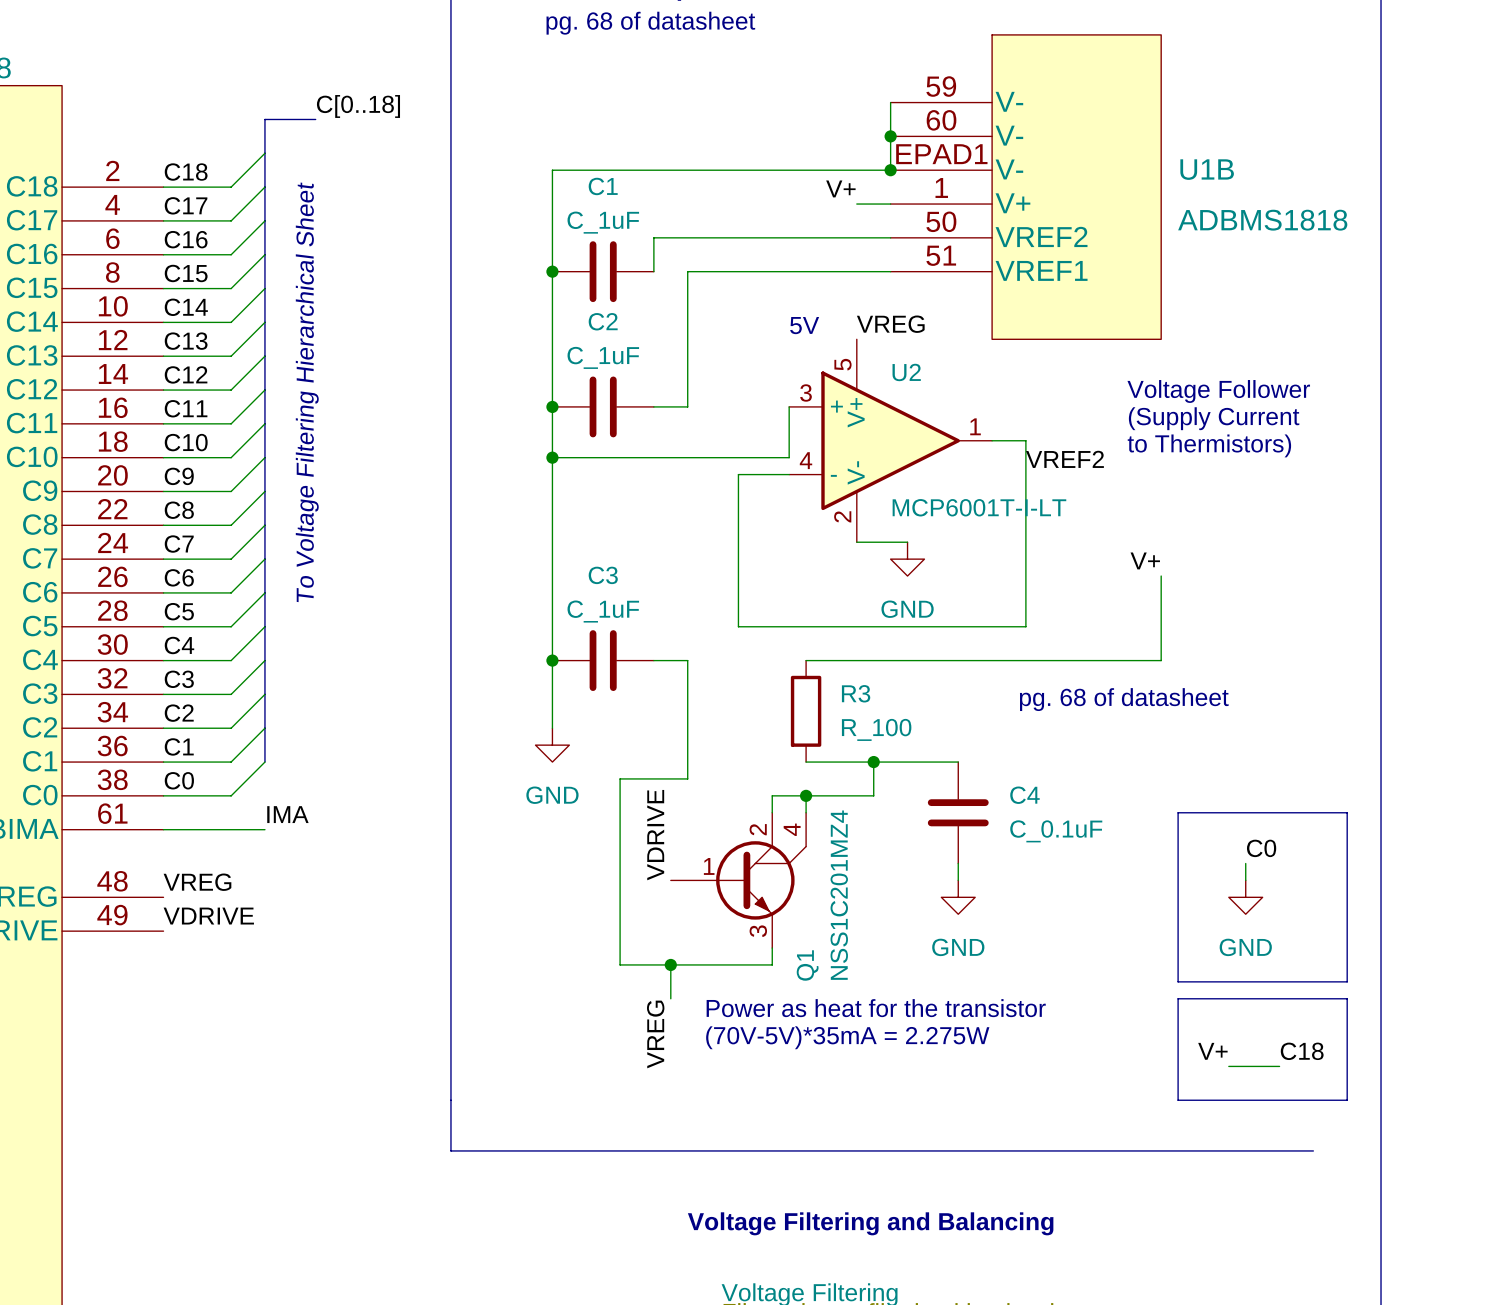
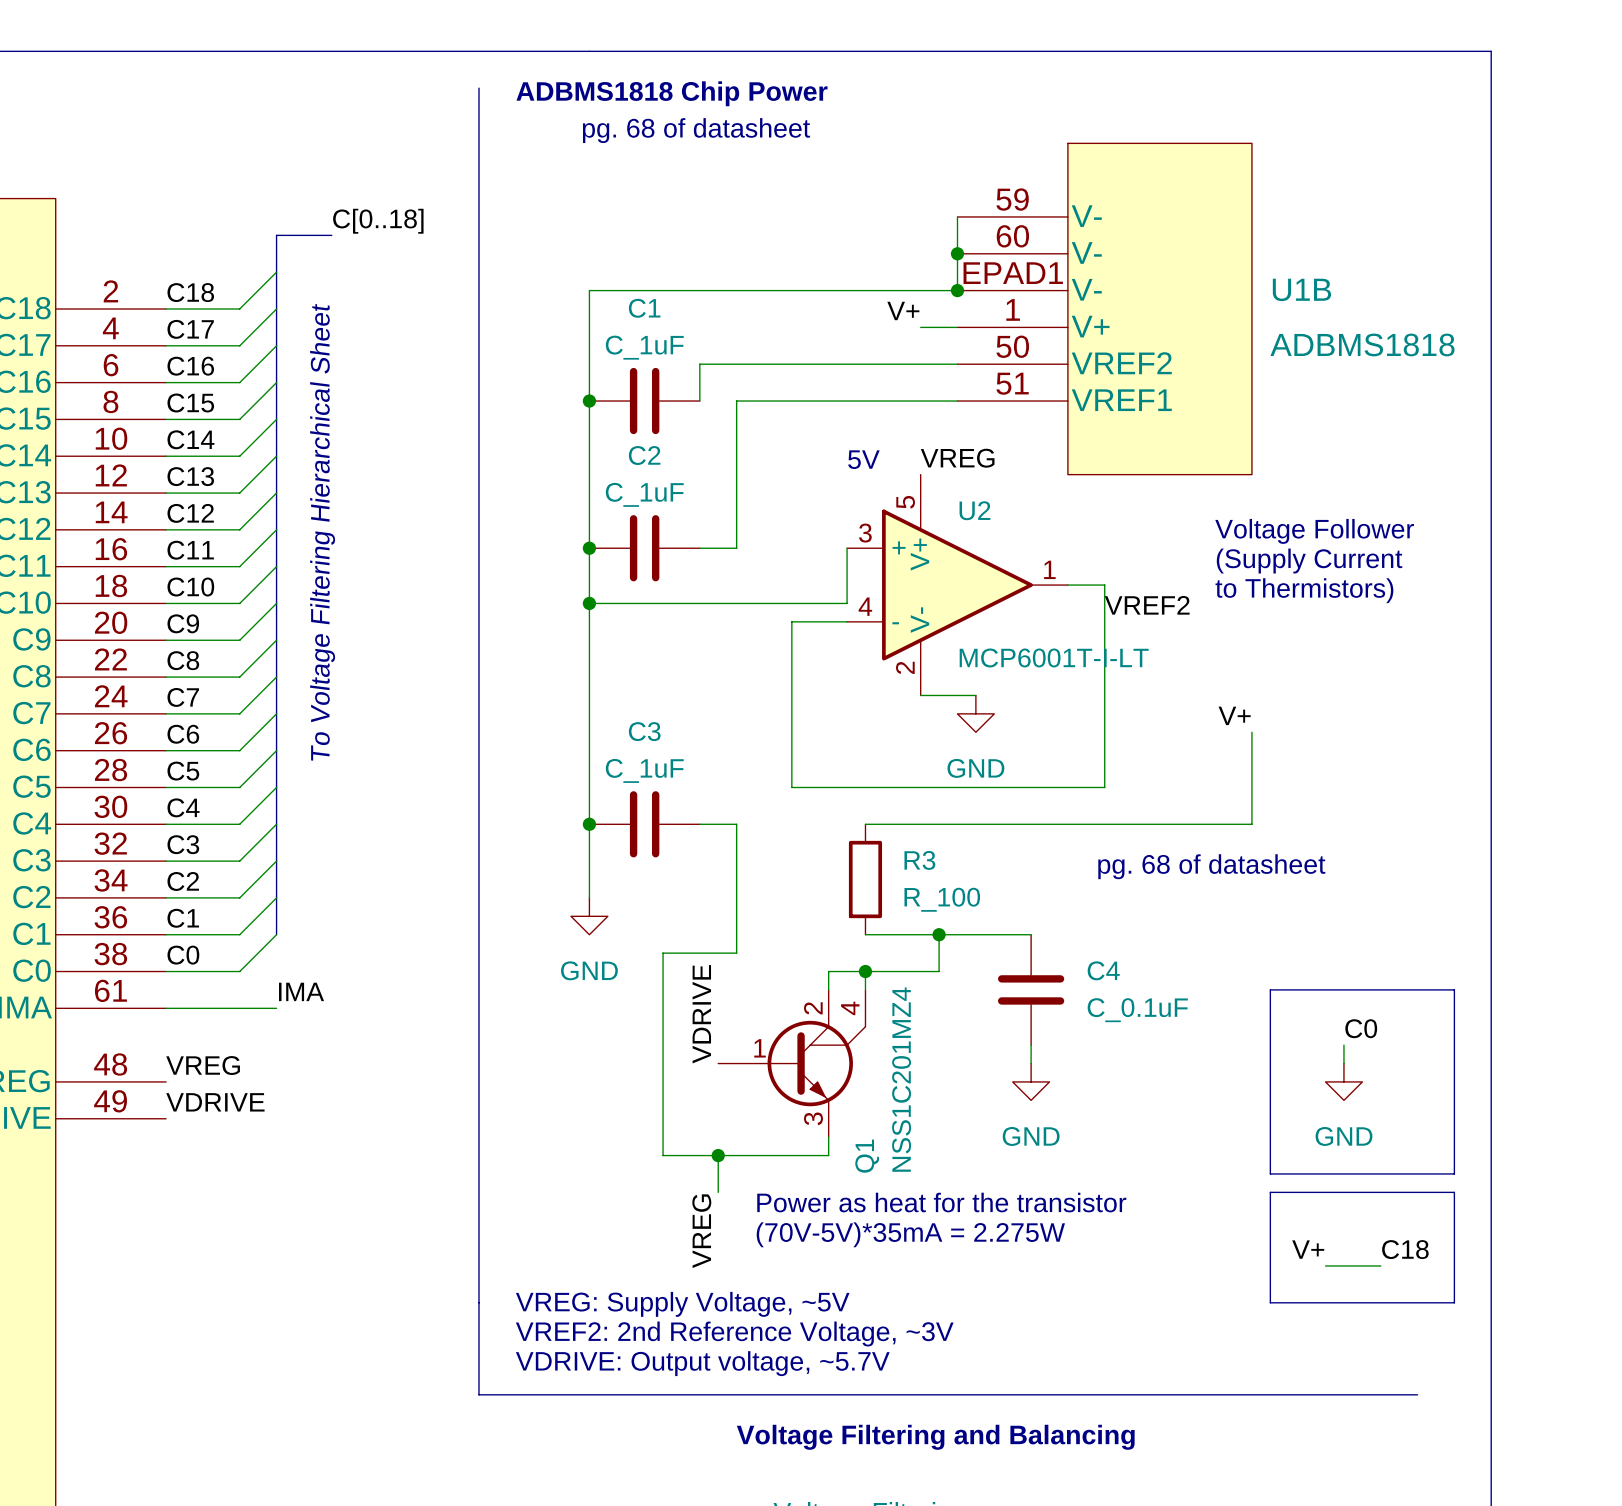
text: none -> VREG: Supply Voltage, ~5V (682, 1304)
text: none -> VREF2: 2nd Reference Voltage, ~3V (734, 1333)
line: (450, 1150) (1313, 1150) -> (478, 1358) (478, 1394) (1417, 1394)
text: none -> VDRIVE: Output voltage, ~5.7V (702, 1363)

